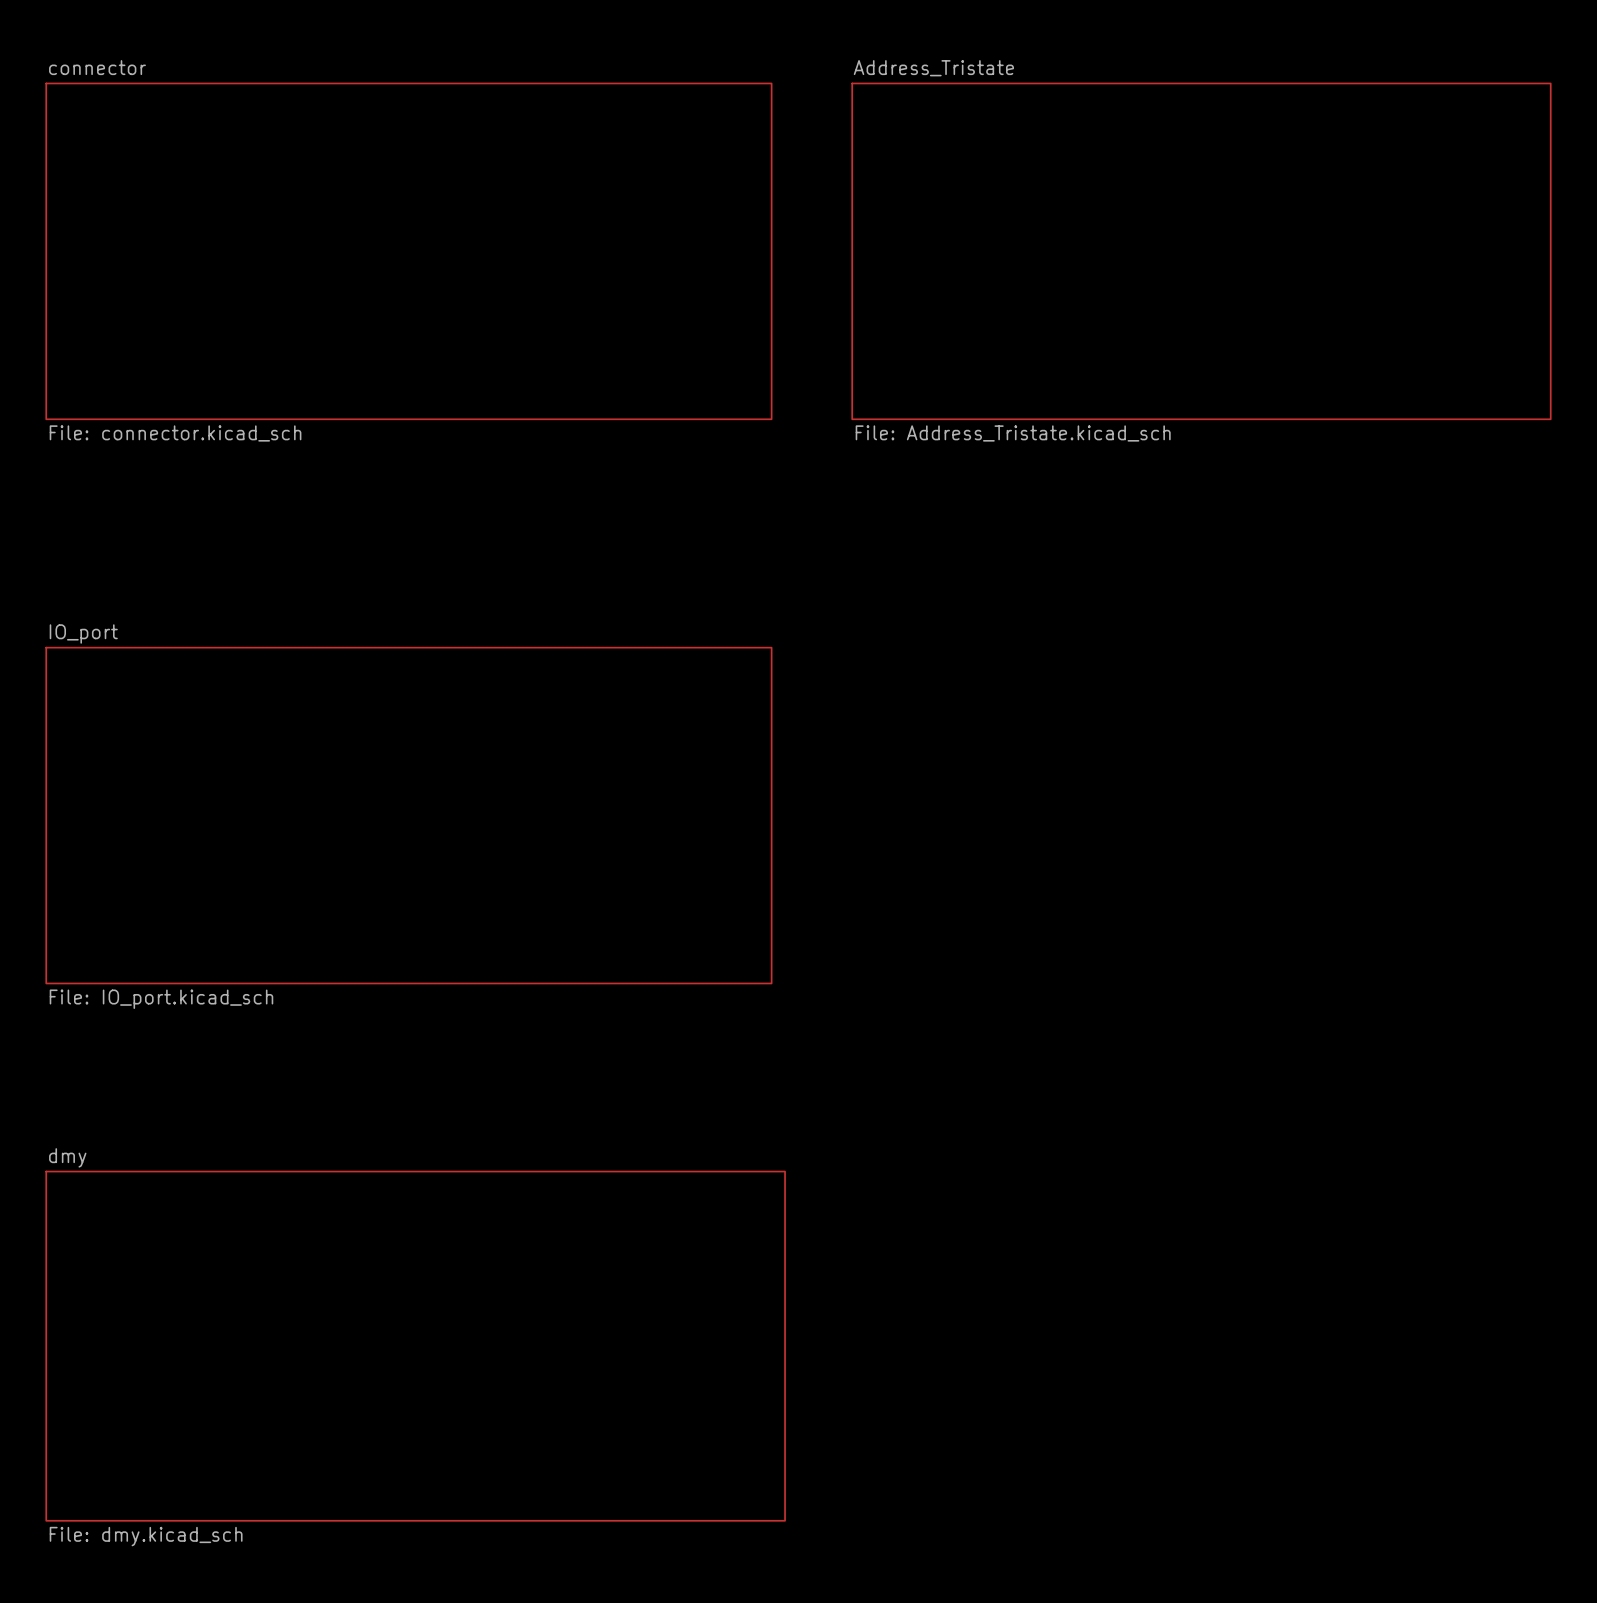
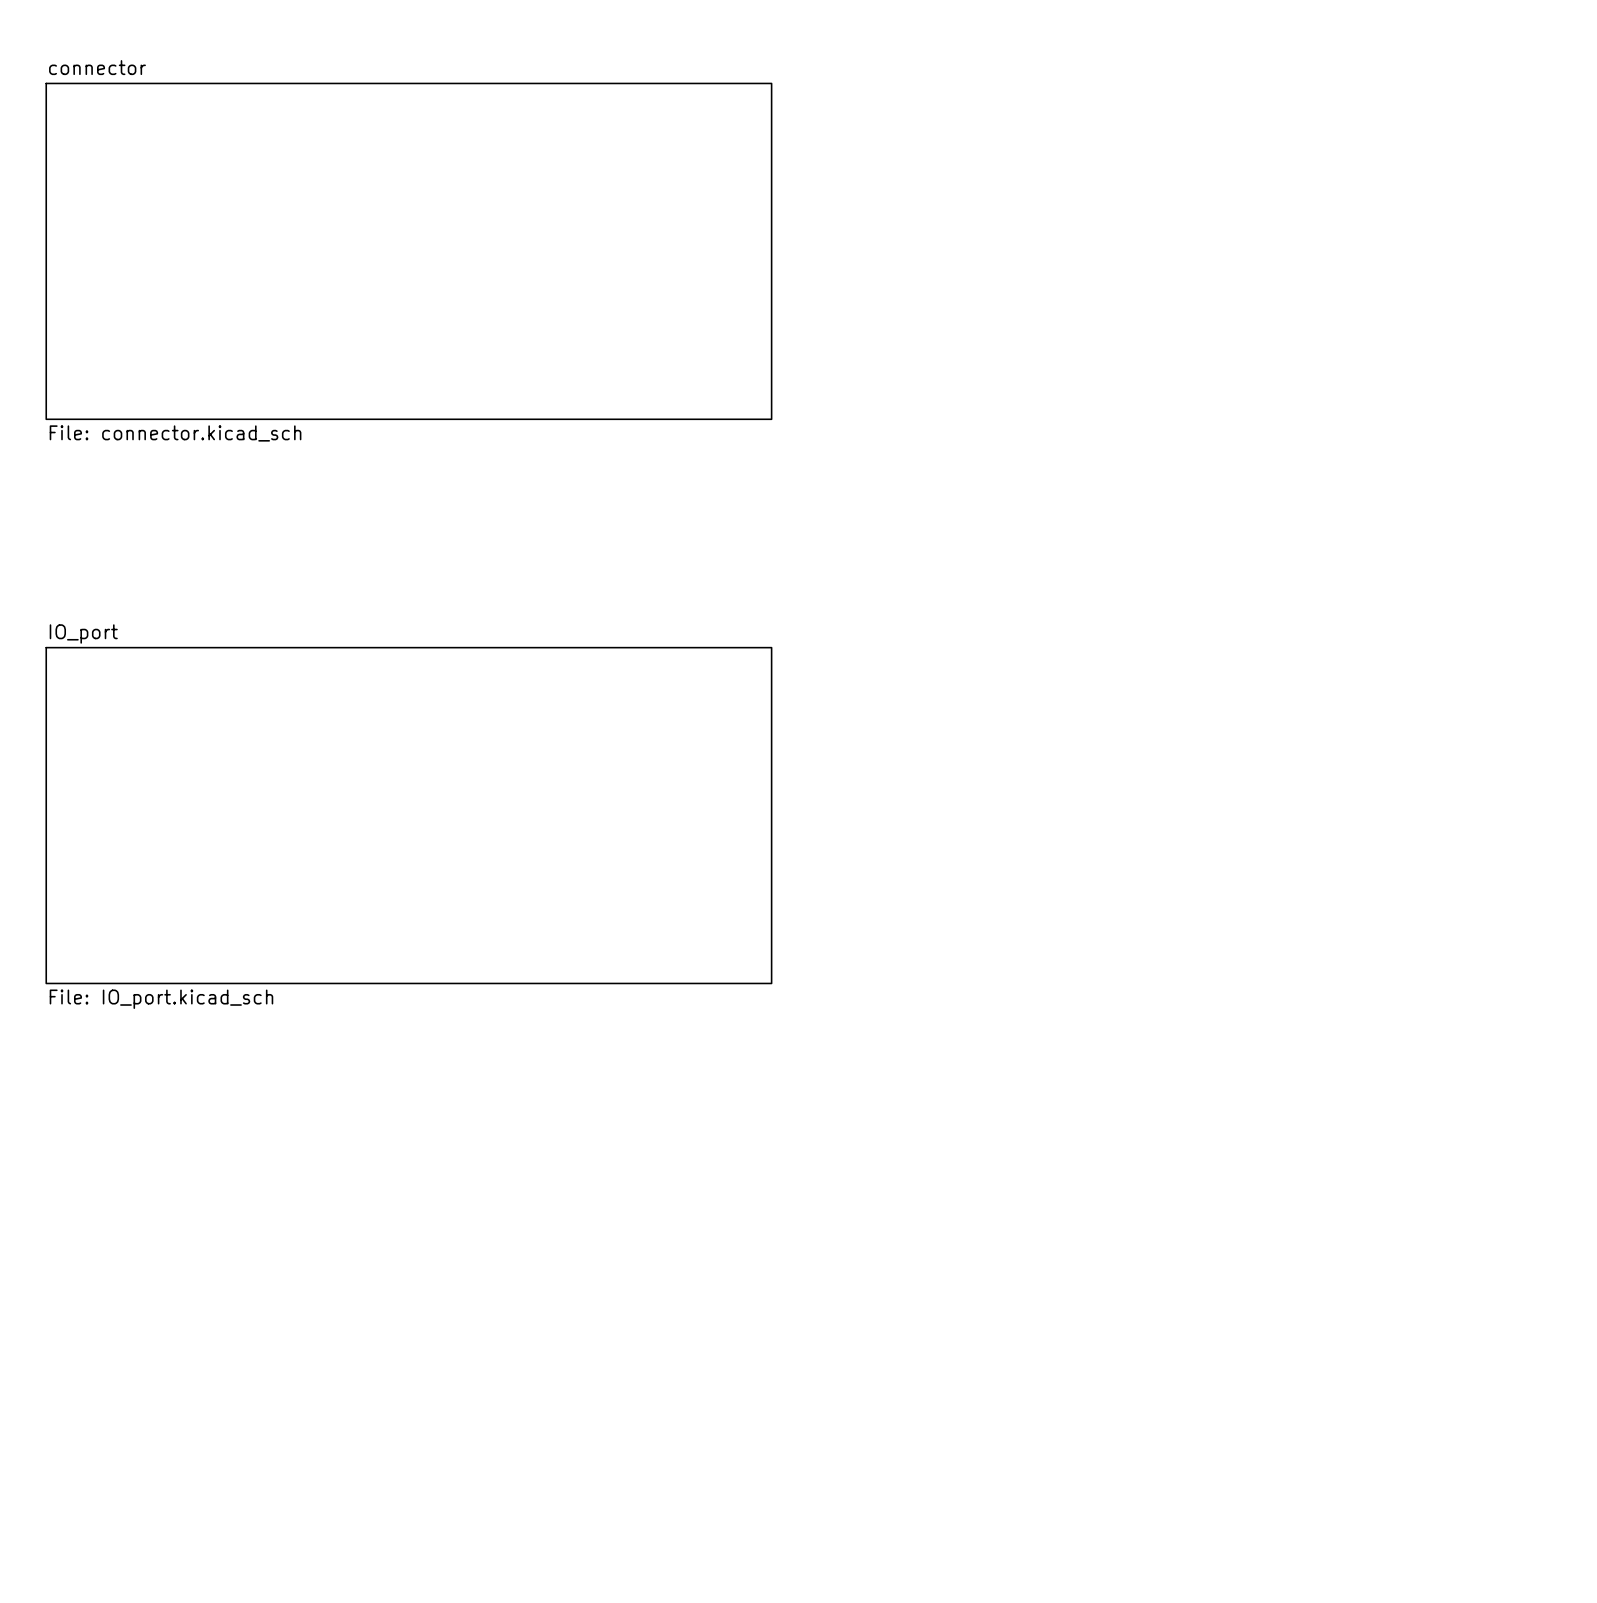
sheet Address_Tristate: File: Address_Tristate.kicad_sch (1201, 251) -> none
sheet dmy: File: dmy.kicad_sch (415, 1346) -> none

